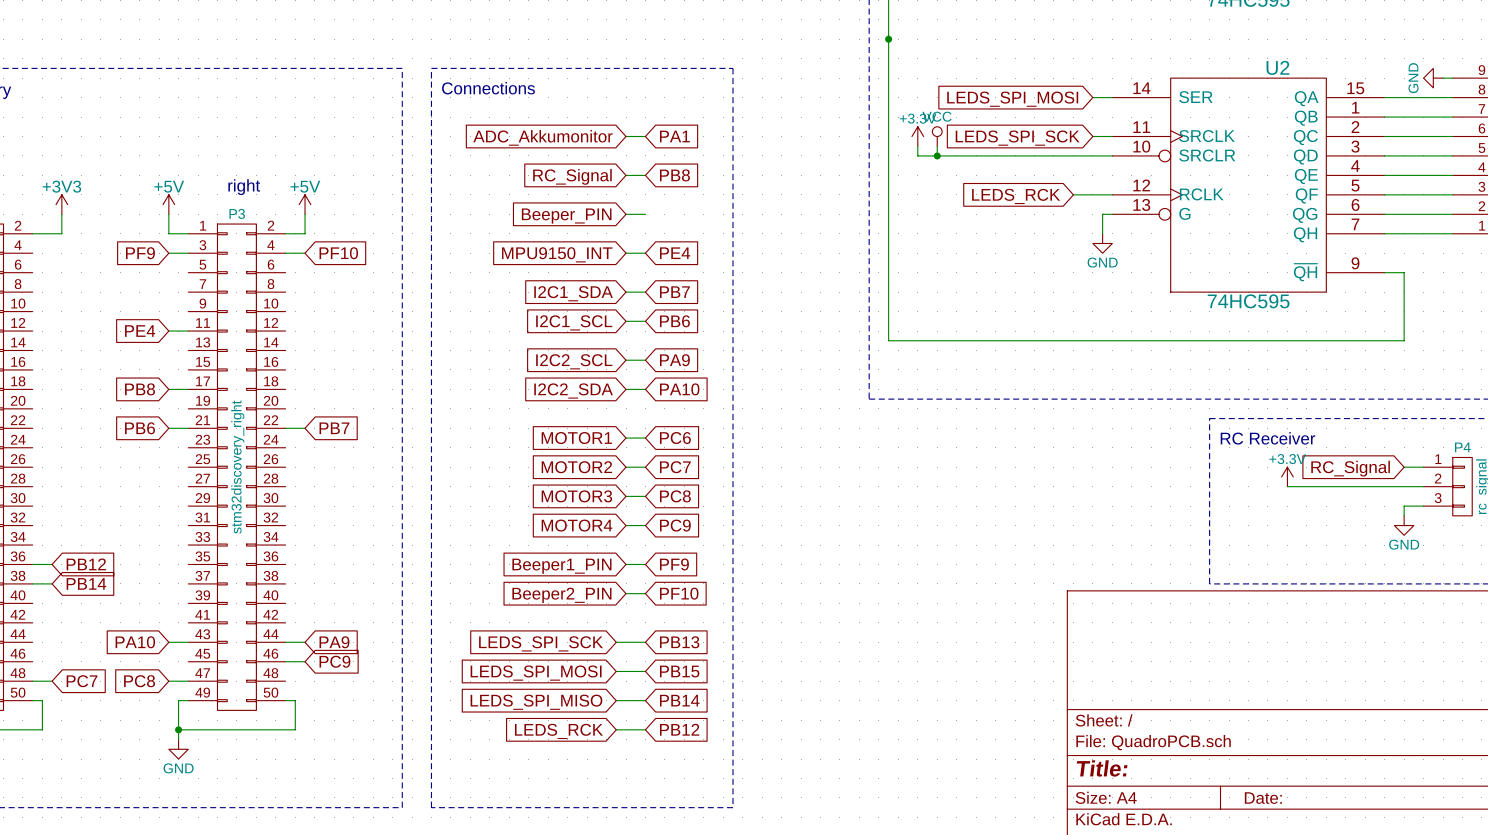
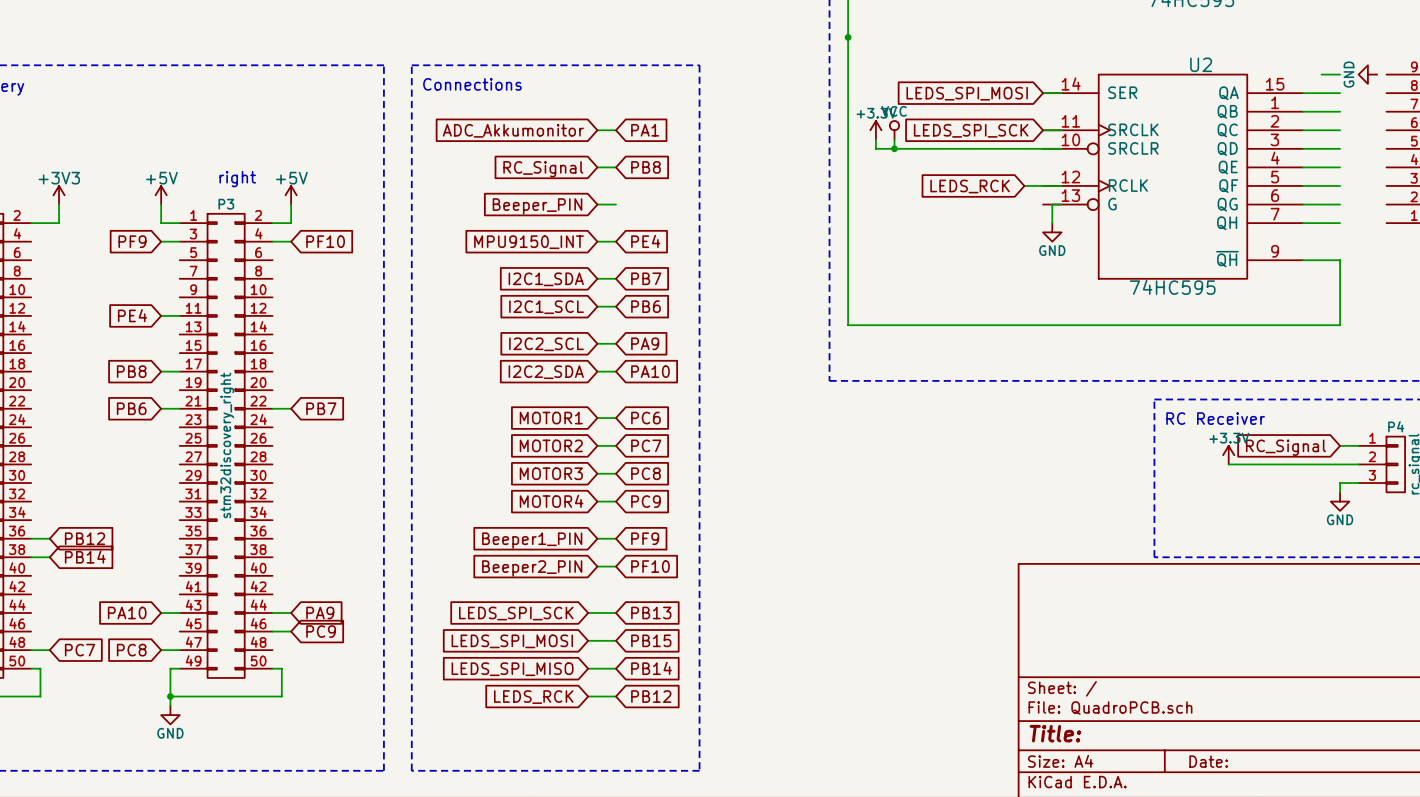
wire: none -> (1321, 74) (1340, 74)
wire: (1443, 78) (1452, 78) -> none
wire: (1404, 97) (1452, 97) -> none
wire: (1404, 117) (1452, 117) -> none
wire: (1404, 136) (1452, 136) -> none
wire: (1404, 155) (1452, 155) -> none
wire: (1404, 175) (1452, 175) -> none
U2 position: (1248, 185) -> (1172, 176)
wire: (1404, 194) (1452, 194) -> none
wire: (1404, 214) (1452, 214) -> none
wire: (1404, 233) (1452, 233) -> none

